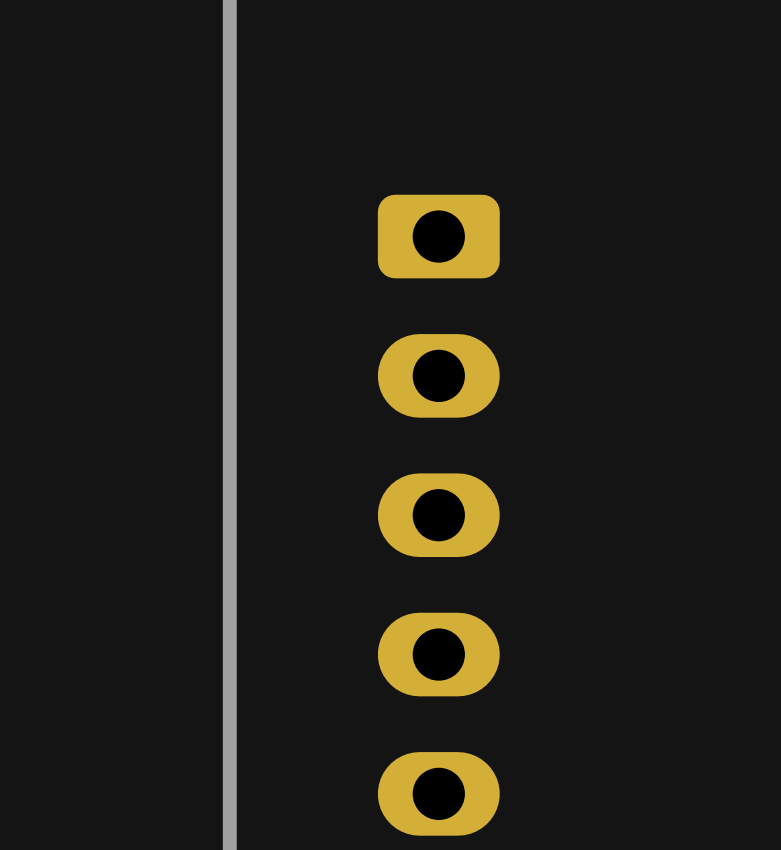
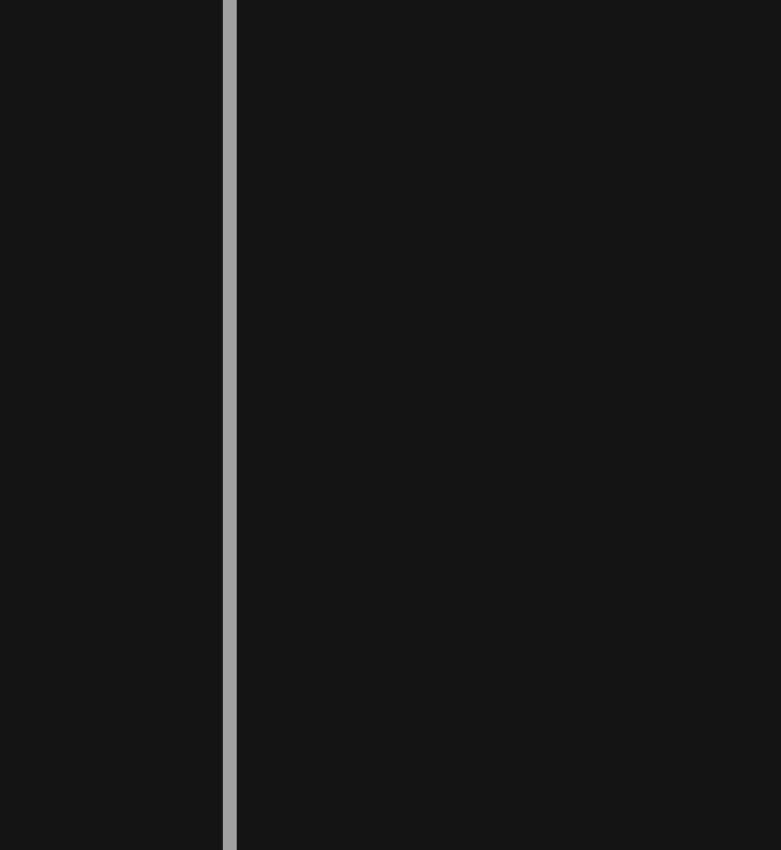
part: (438, 515) -> none

